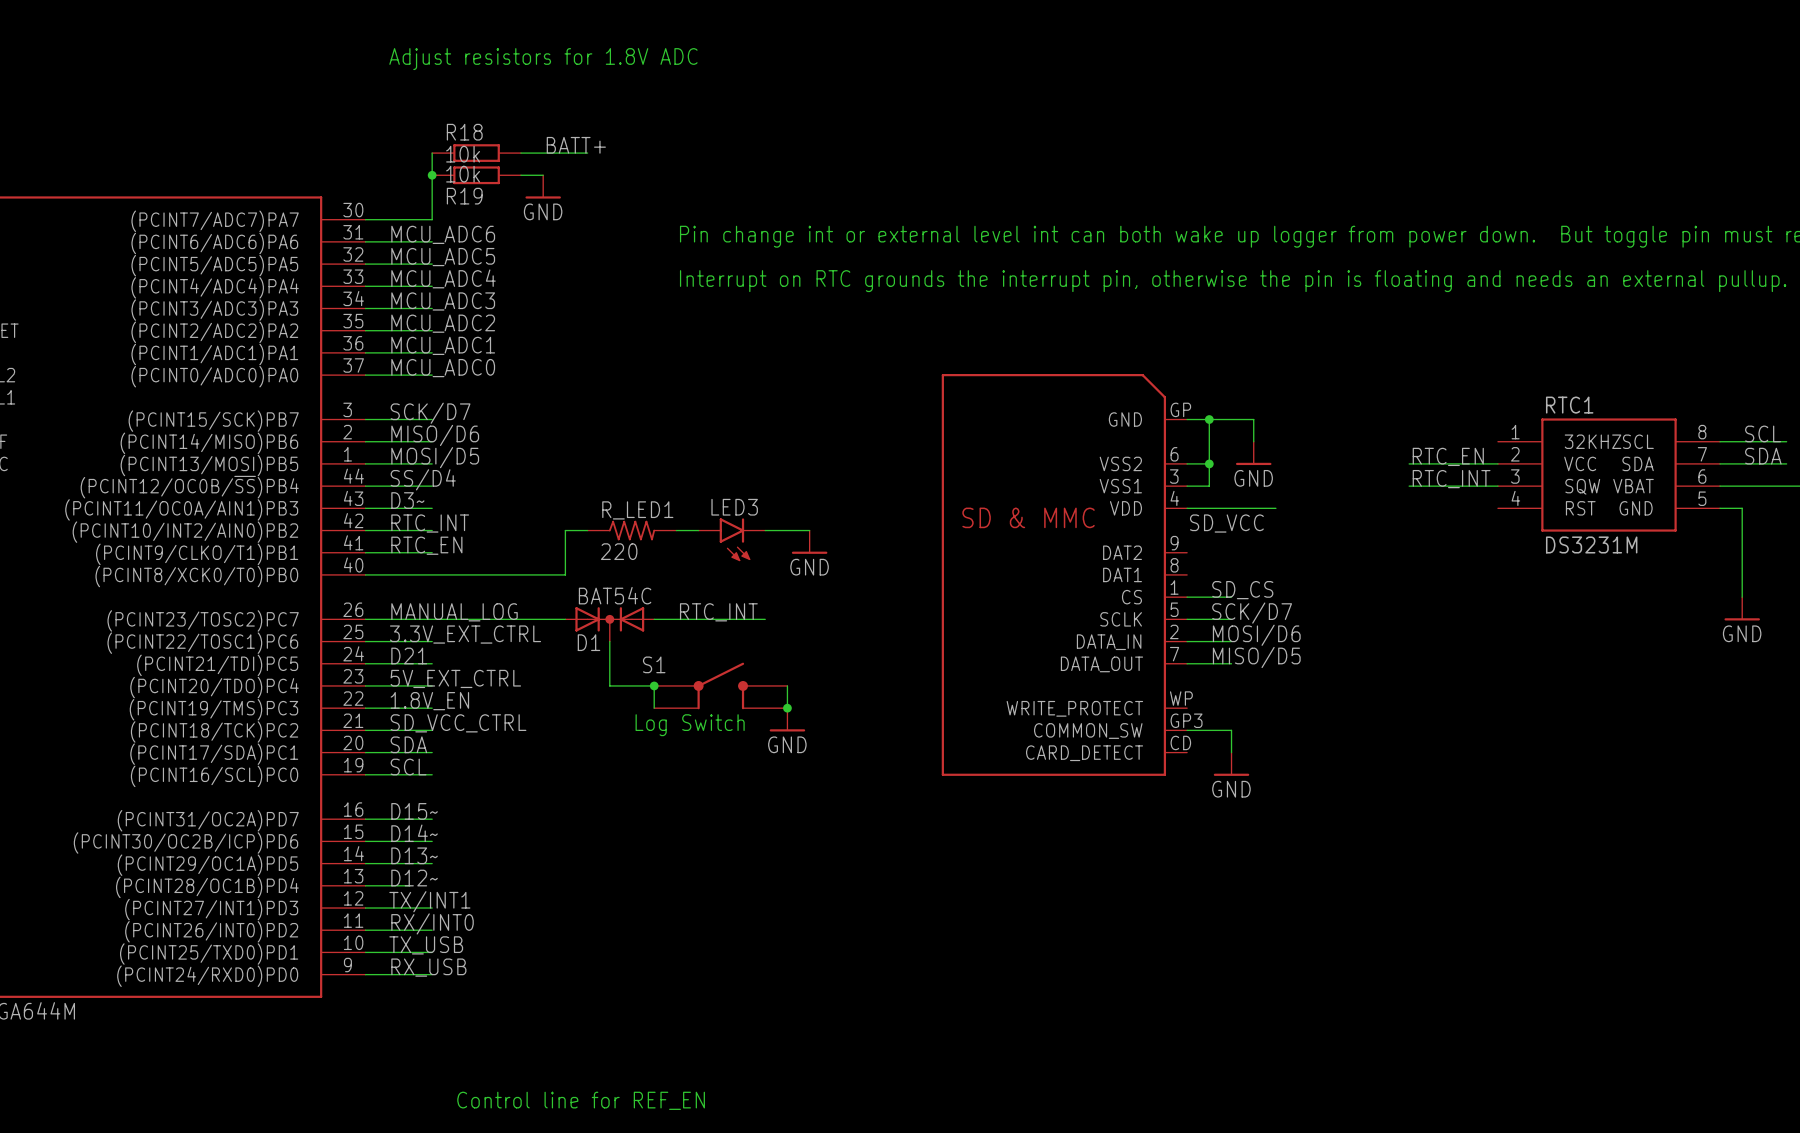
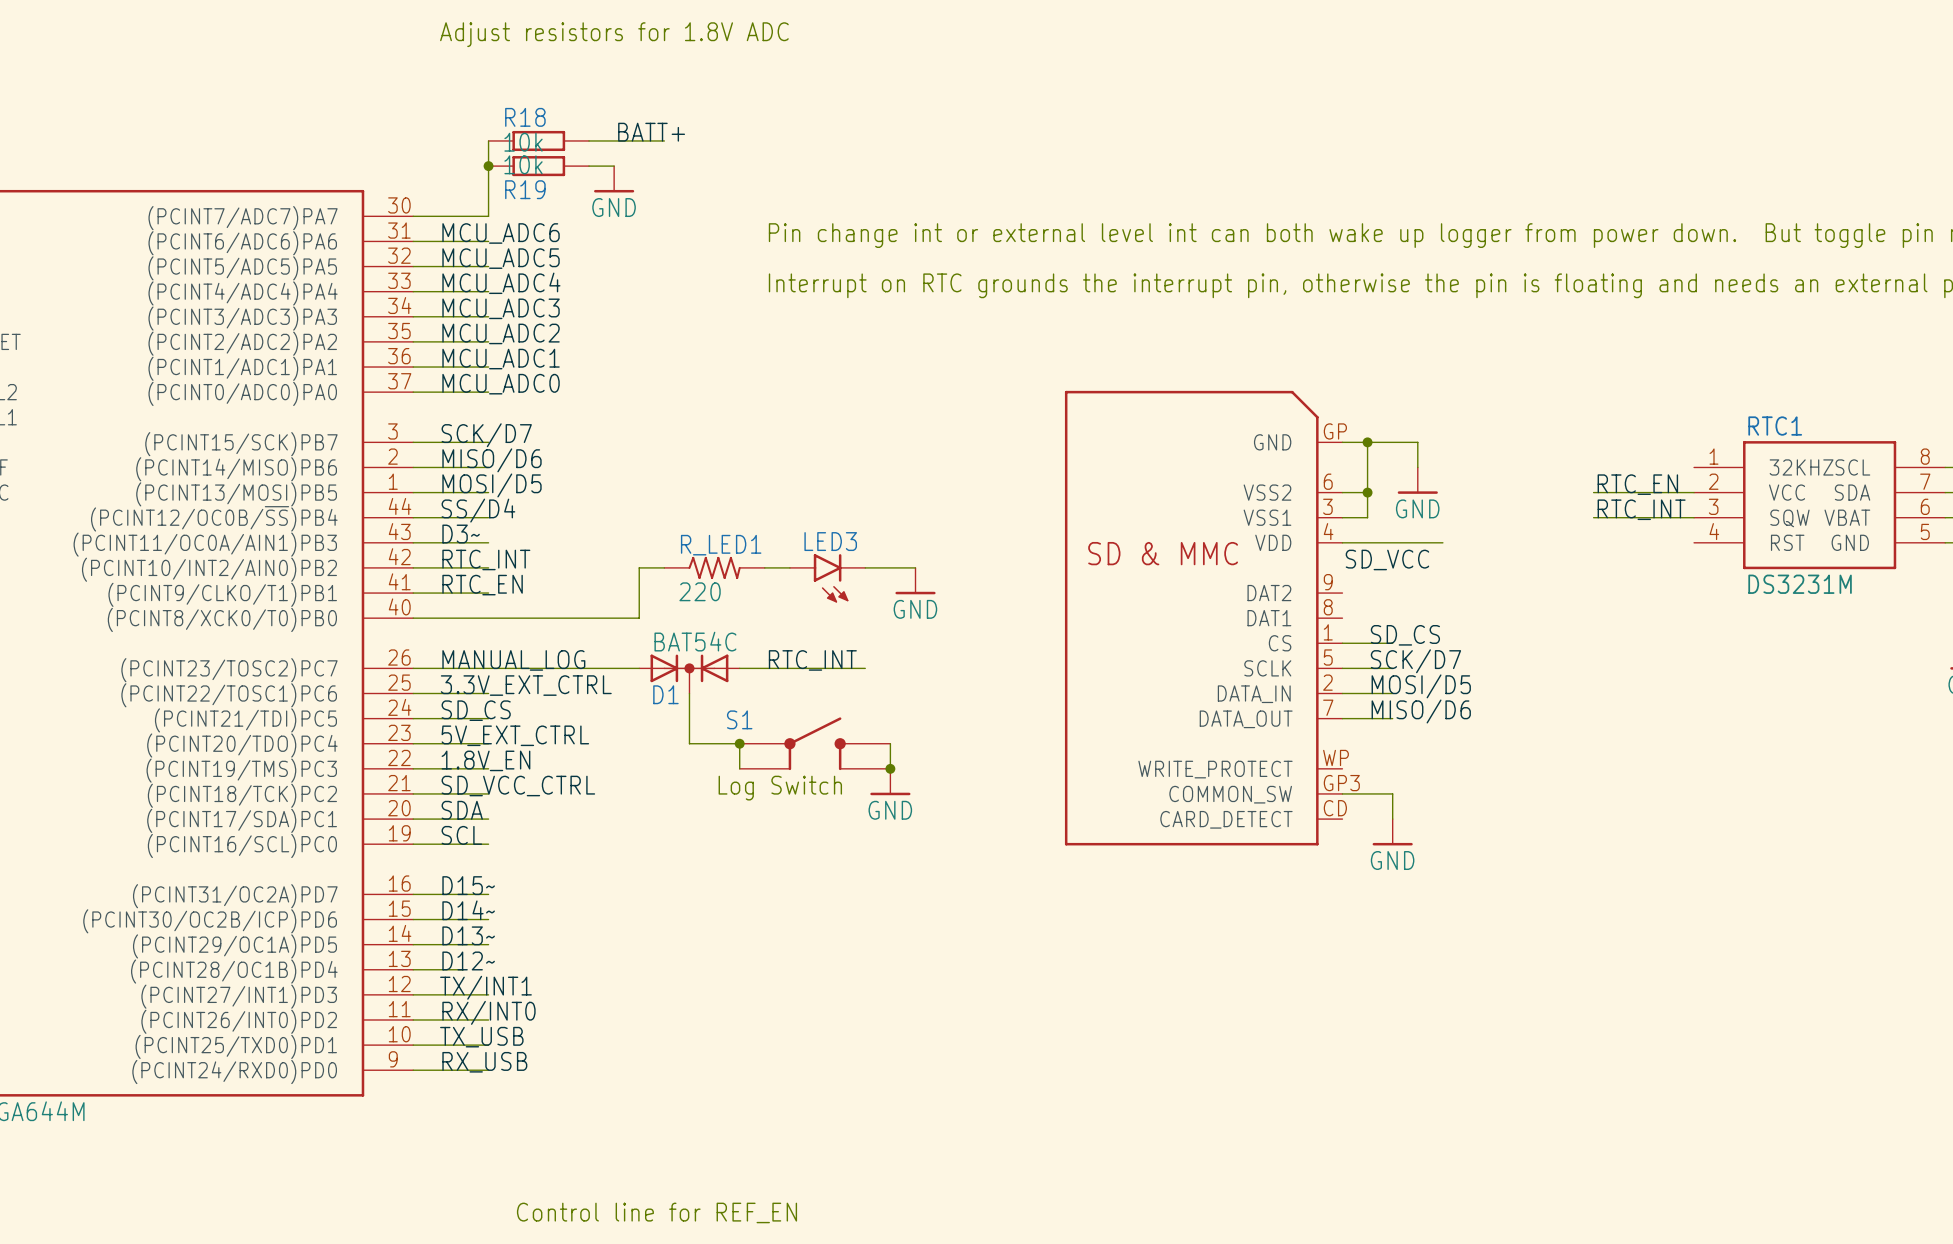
label: MOSI/D6 (1256, 635) -> MOSI/D5 (1421, 686)
label: D21 (409, 655) -> SD_CS (476, 710)
label: MISO/D5 (1256, 657) -> MISO/D6 (1421, 711)

